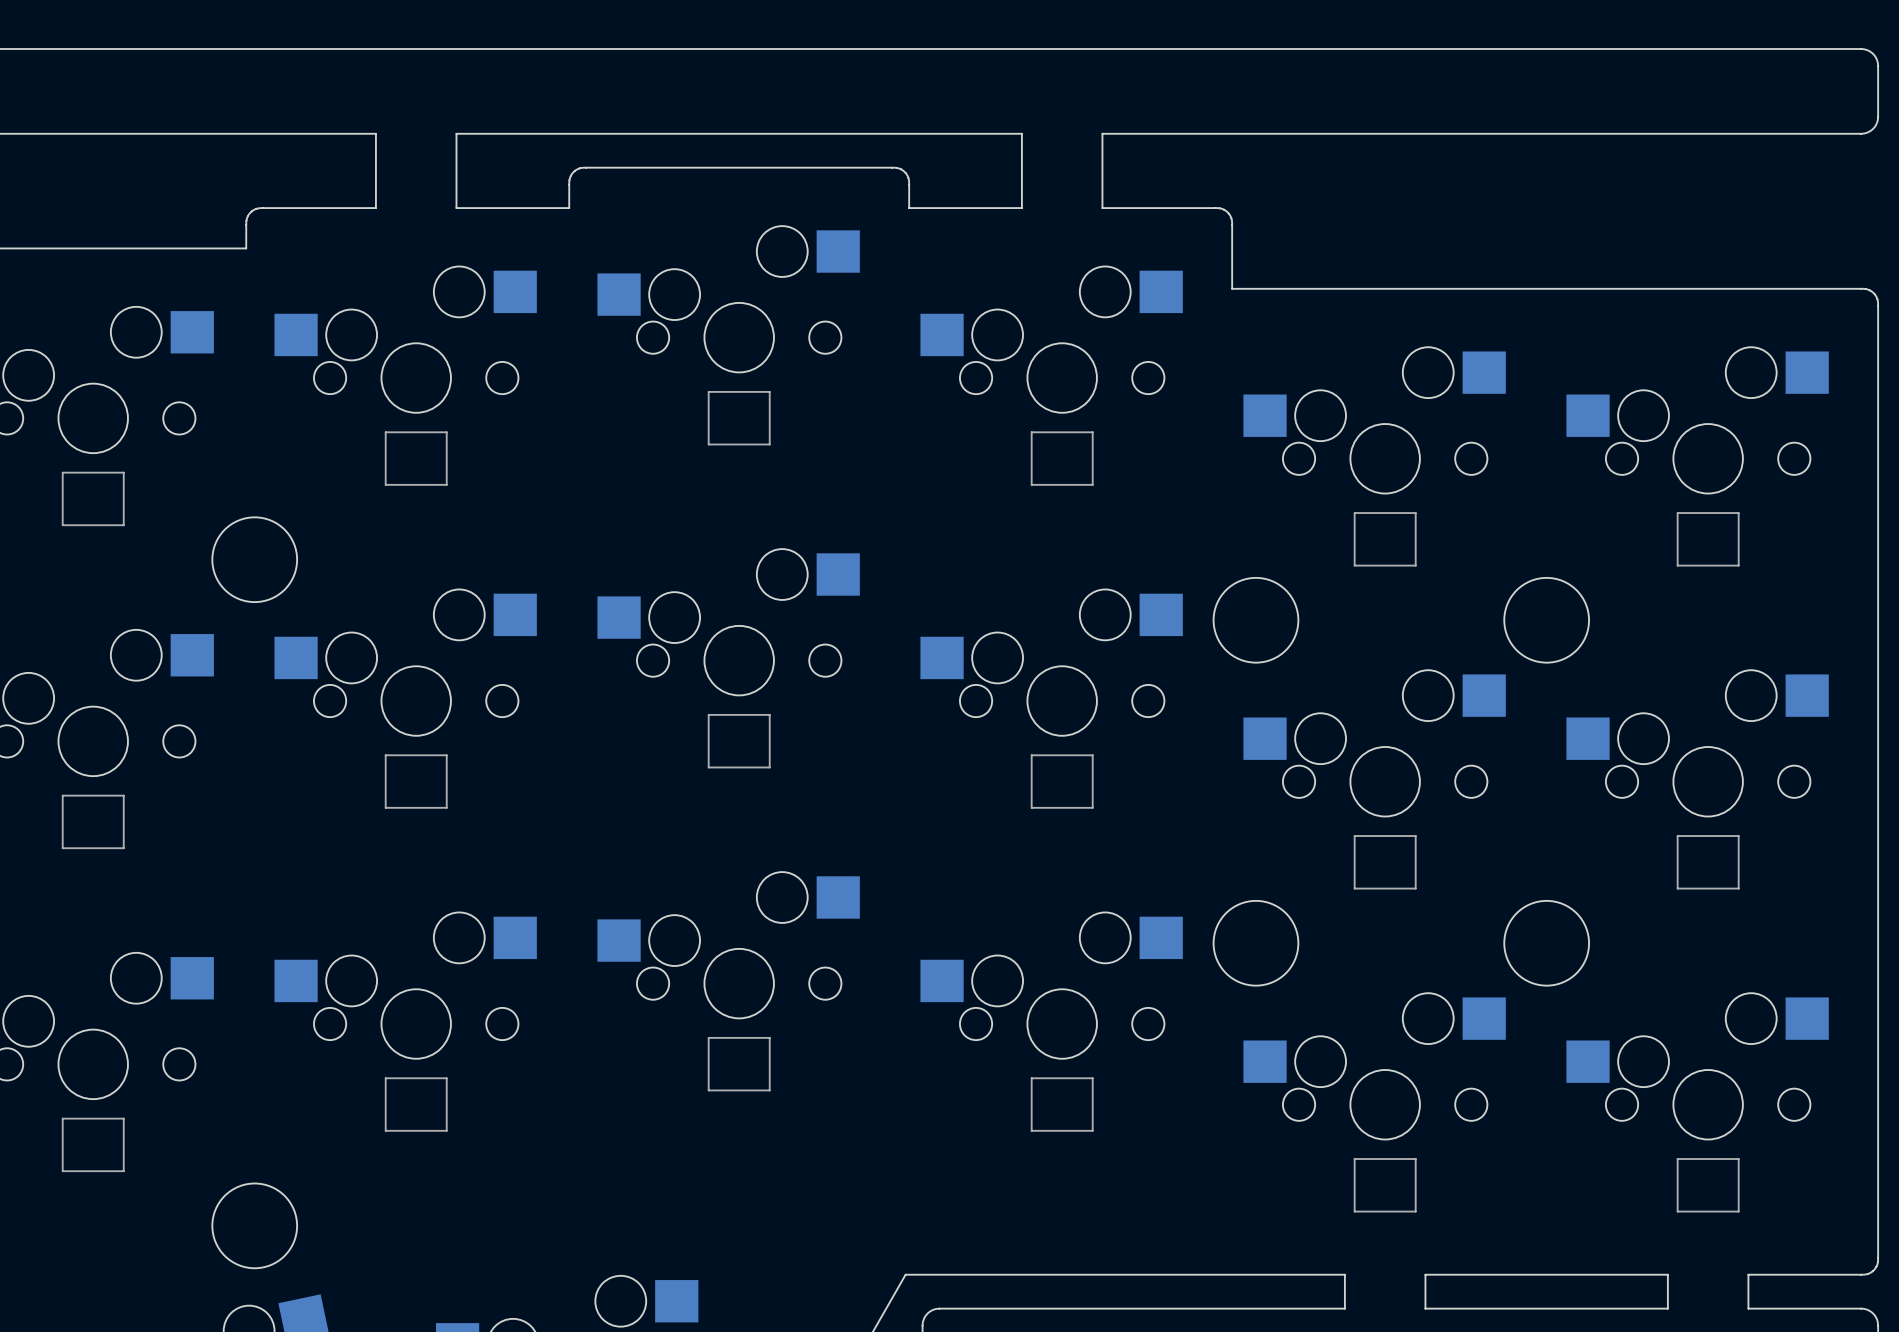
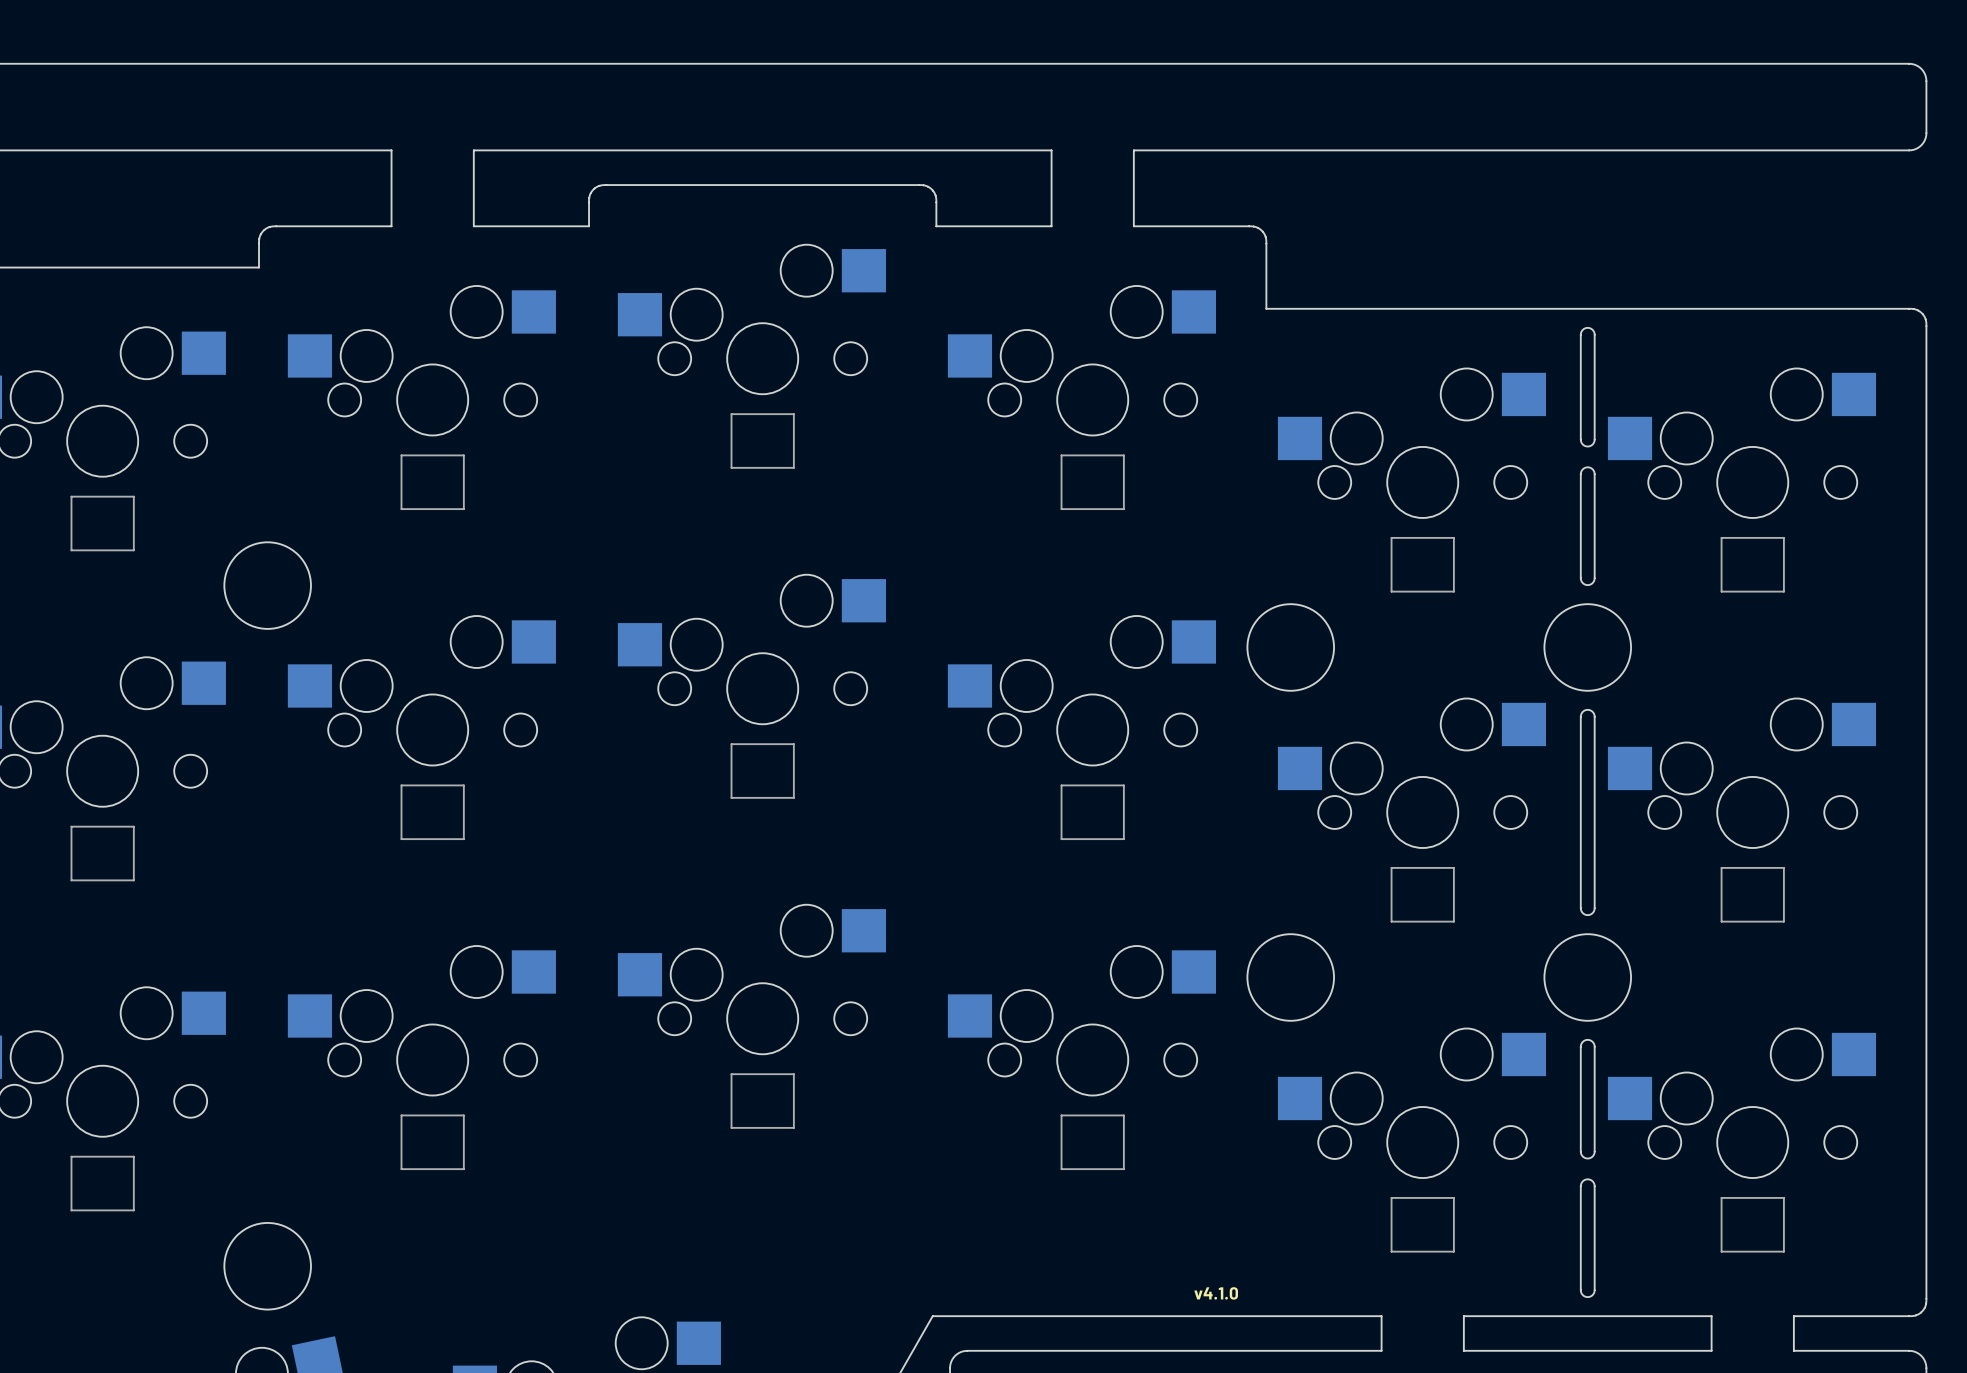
board edge: none -> (1580, 334) (1580, 440) (1583, 444) (1588, 446) (1592, 444) (1594, 439) (1594, 333) (1591, 329) (1586, 327) (1582, 330) (1580, 334)
board edge: none -> (1580, 474) (1580, 579) (1583, 583) (1588, 585) (1592, 583) (1594, 578) (1594, 473) (1592, 469) (1586, 467) (1582, 469) (1580, 474)
board edge: none -> (1580, 716) (1580, 908) (1582, 912) (1587, 915) (1592, 912) (1594, 908) (1594, 716) (1592, 711) (1587, 709) (1582, 712) (1580, 716)
board edge: none -> (1580, 1046) (1580, 1152) (1583, 1157) (1588, 1158) (1592, 1156) (1594, 1151) (1594, 1045) (1591, 1041) (1586, 1039) (1582, 1042) (1580, 1046)
board edge: none -> (1580, 1186) (1580, 1291) (1583, 1295) (1588, 1297) (1592, 1294) (1594, 1290) (1594, 1185) (1591, 1180) (1586, 1179) (1582, 1181) (1580, 1186)
text: none -> v4.1.0 (1216, 1293)

